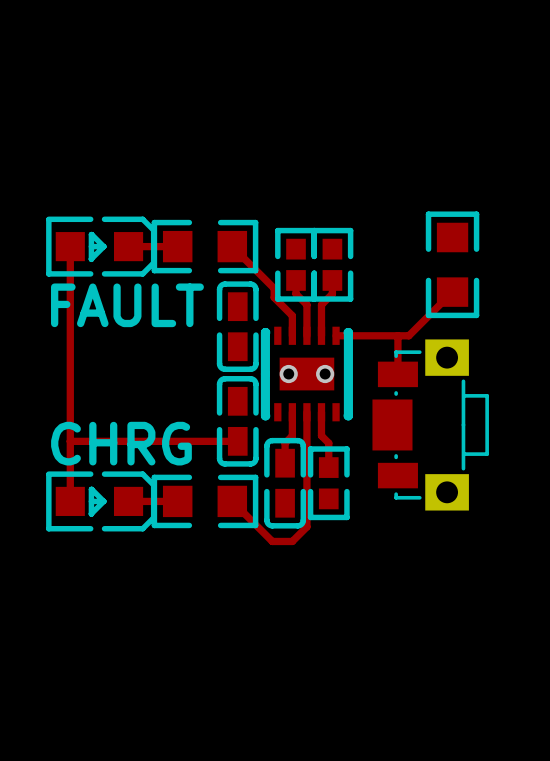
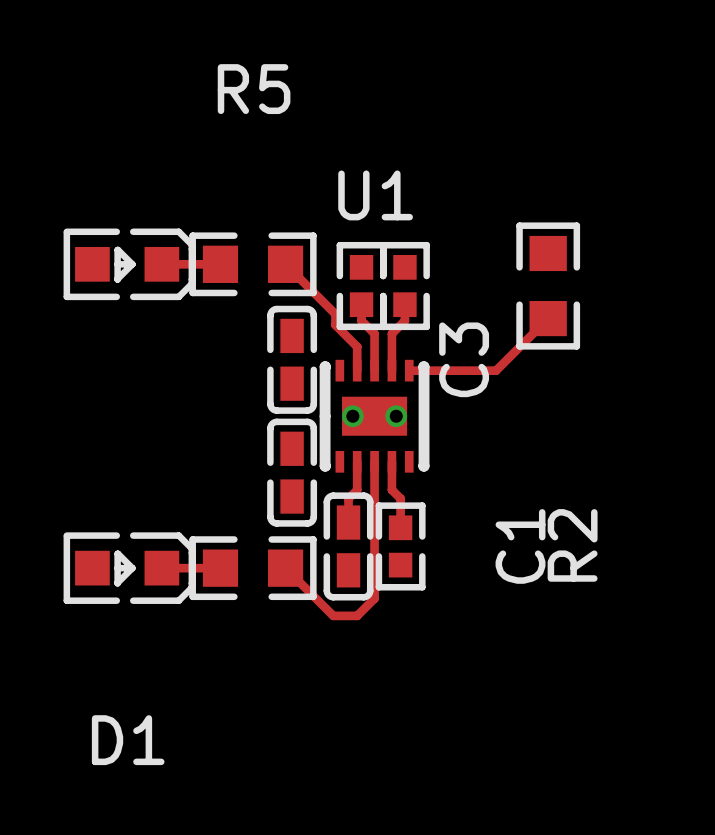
R5 name: none -> R5 (254, 89)
U1 name: none -> U1 (375, 195)
track: (70, 246) (70, 501) -> none
text: FAULT (127, 305) -> none
C3 name: none -> C3 (464, 359)
track: (397, 335) (397, 374) -> none
part: (430, 424) -> none
track: (70, 441) (237, 441) -> none
text: CHRG (121, 443) -> none
R2 name: none -> R2 (572, 545)
C1 name: none -> C1 (520, 546)
D1 name: none -> D1 (128, 740)

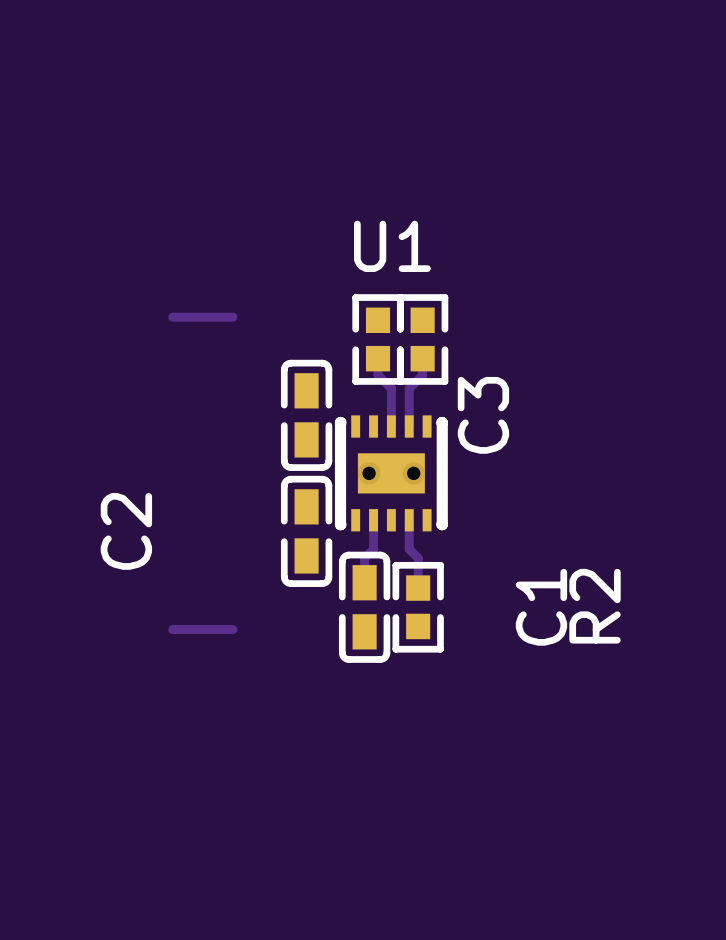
part: (129, 264) -> none
R5: (253, 264) -> none
track: (285, 264) (335, 314) (335, 325) (357, 346) (357, 370) -> none
part: (548, 286) -> none
track: (548, 318) (496, 370) (409, 370) -> none
track: (374, 461) (374, 598) (357, 615) (333, 615) (285, 568) -> none
C2 name: none -> C2 (126, 531)
D1: (129, 568) -> none
part: (253, 568) -> none

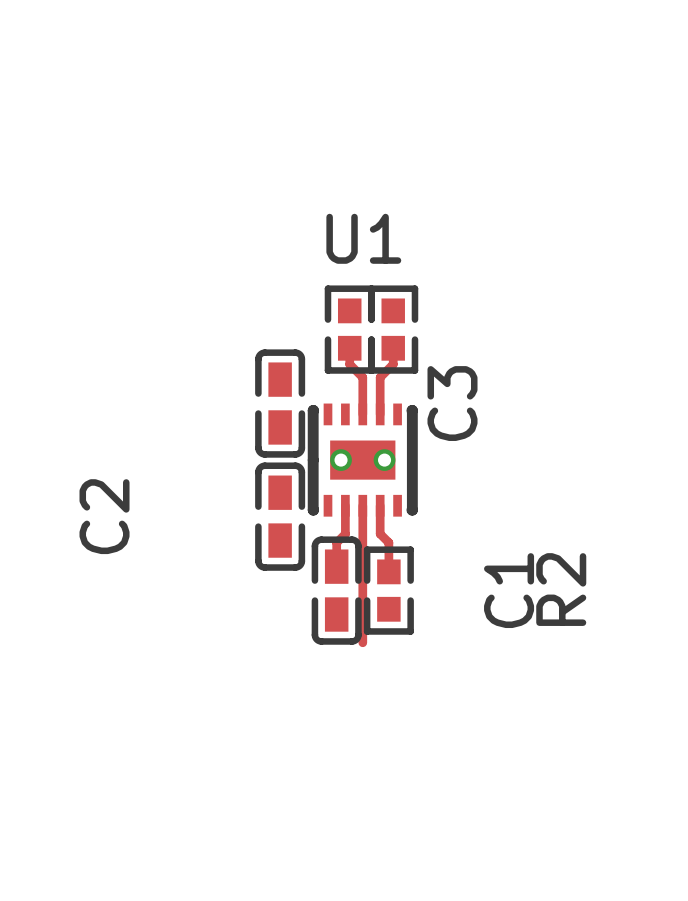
track: (172, 317) (232, 317) -> none
track: none -> (362, 505) (362, 642)
track: (172, 629) (232, 629) -> none

